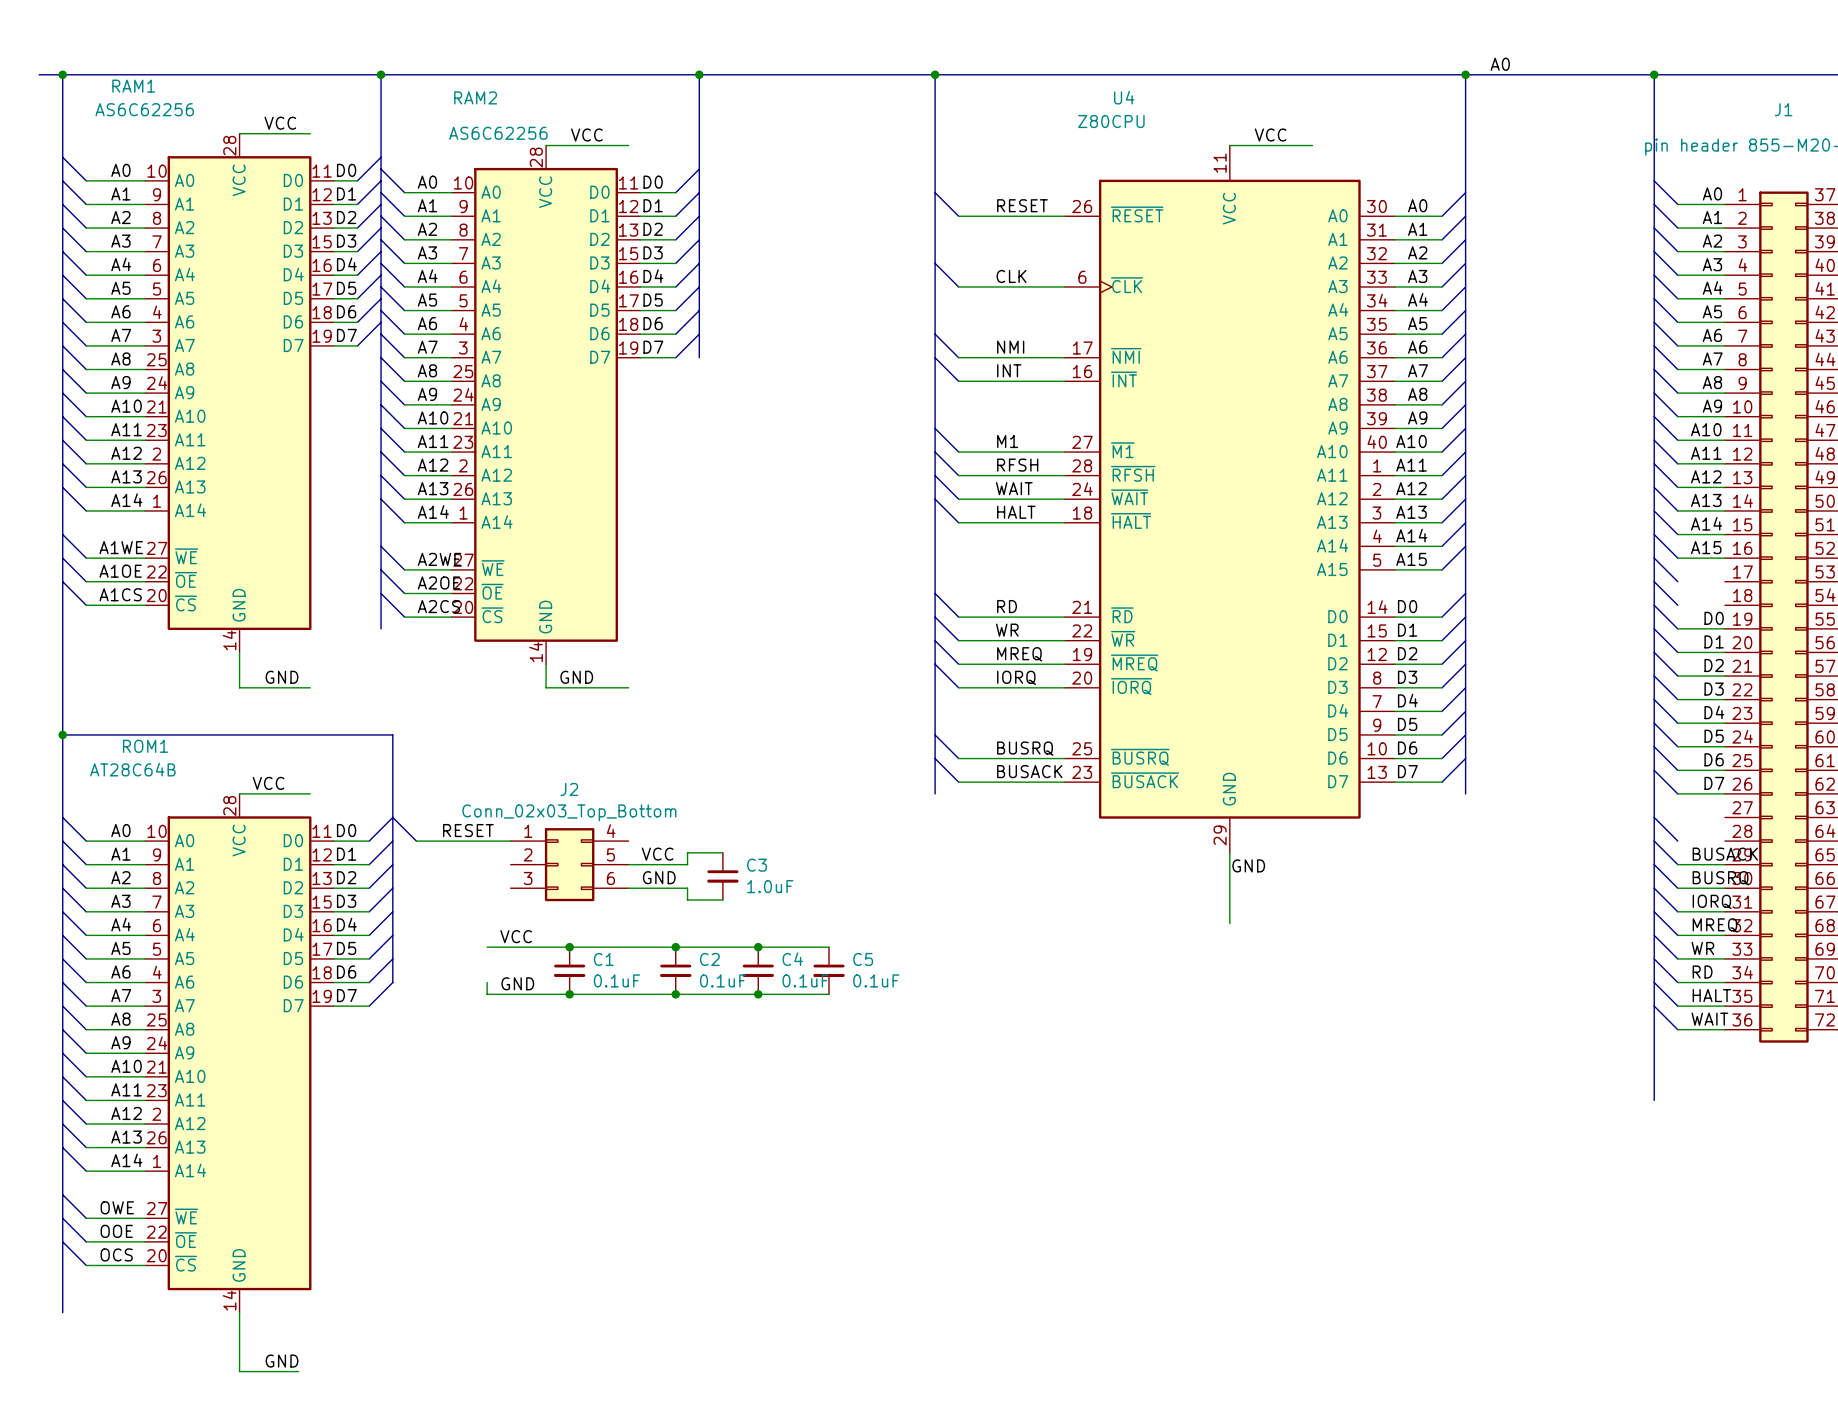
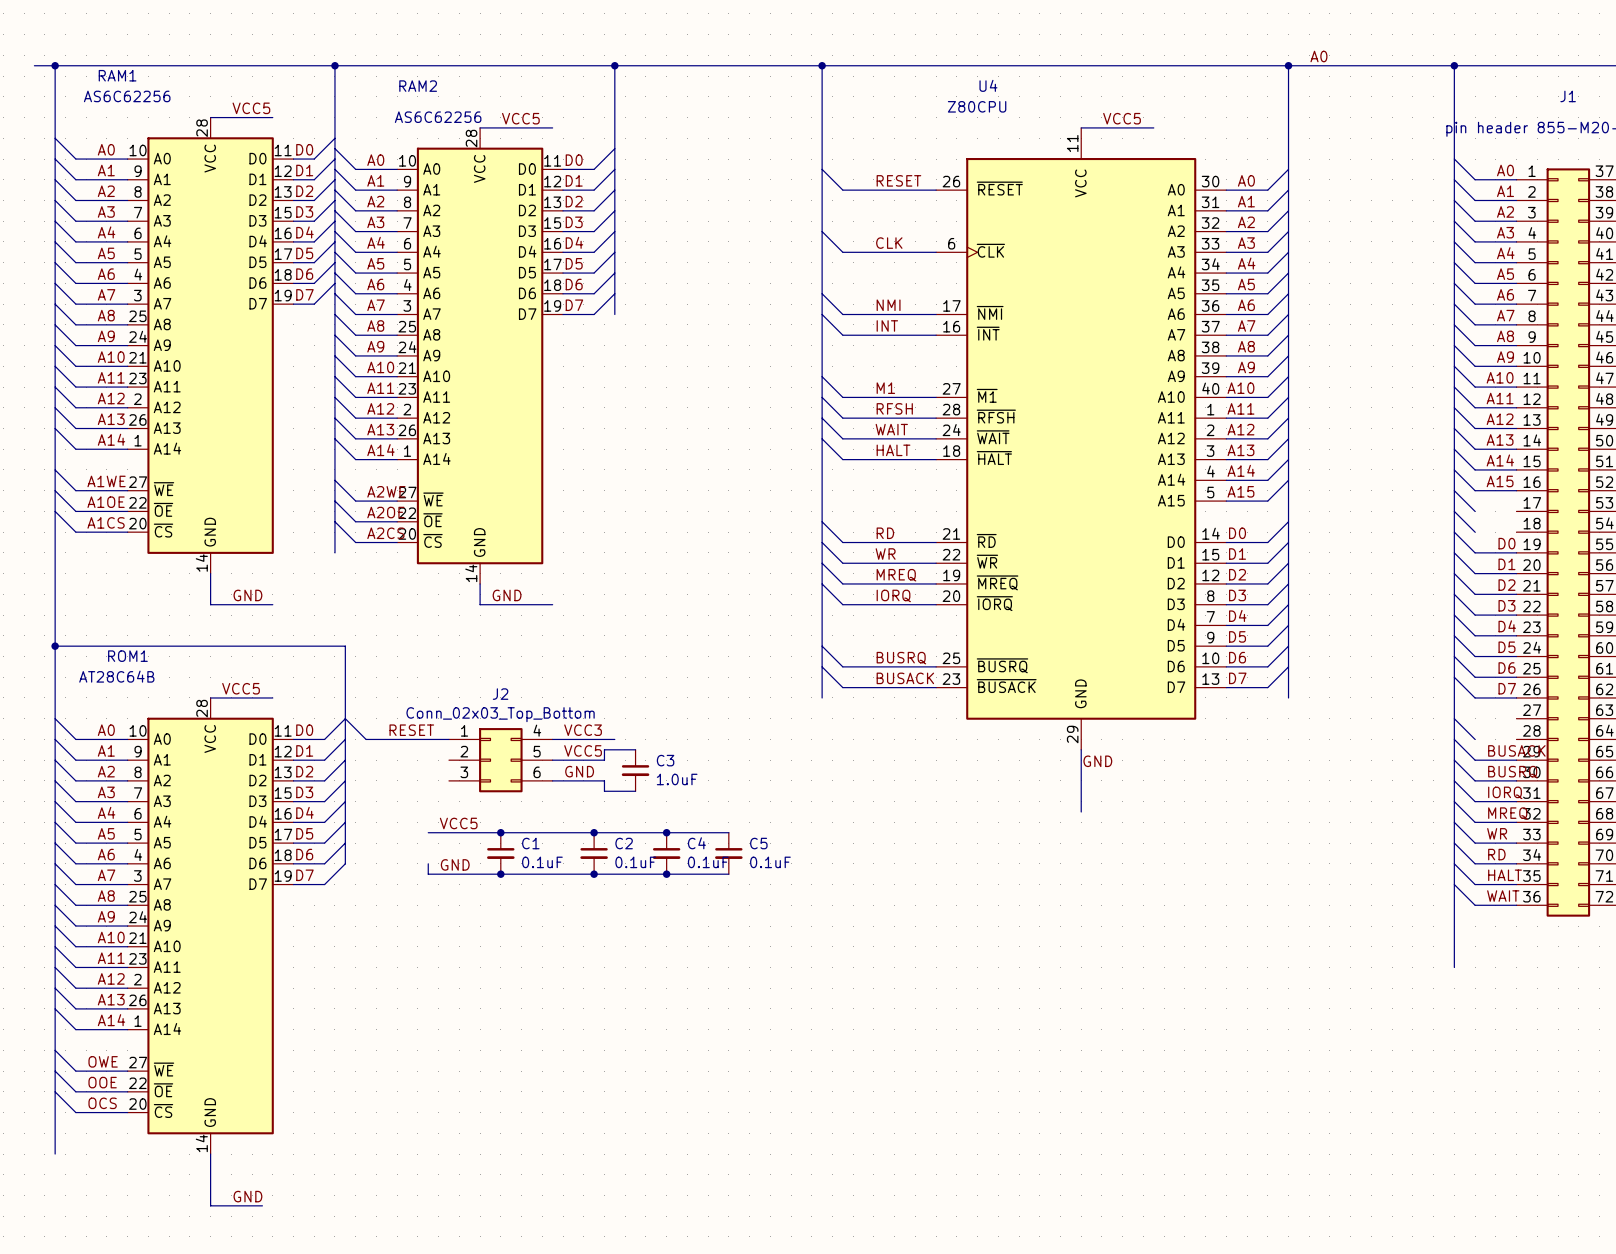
label: VCC (280, 123) -> VCC5 (251, 108)
label: VCC (586, 135) -> VCC5 (520, 118)
label: VCC (1270, 135) -> VCC5 (1122, 118)
label: VCC (268, 783) -> VCC5 (241, 688)
label: none -> VCC3 (583, 730)
wire: none -> (552, 739) (614, 739)
label: VCC (657, 854) -> VCC5 (583, 750)
label: VCC (516, 936) -> VCC5 (458, 823)

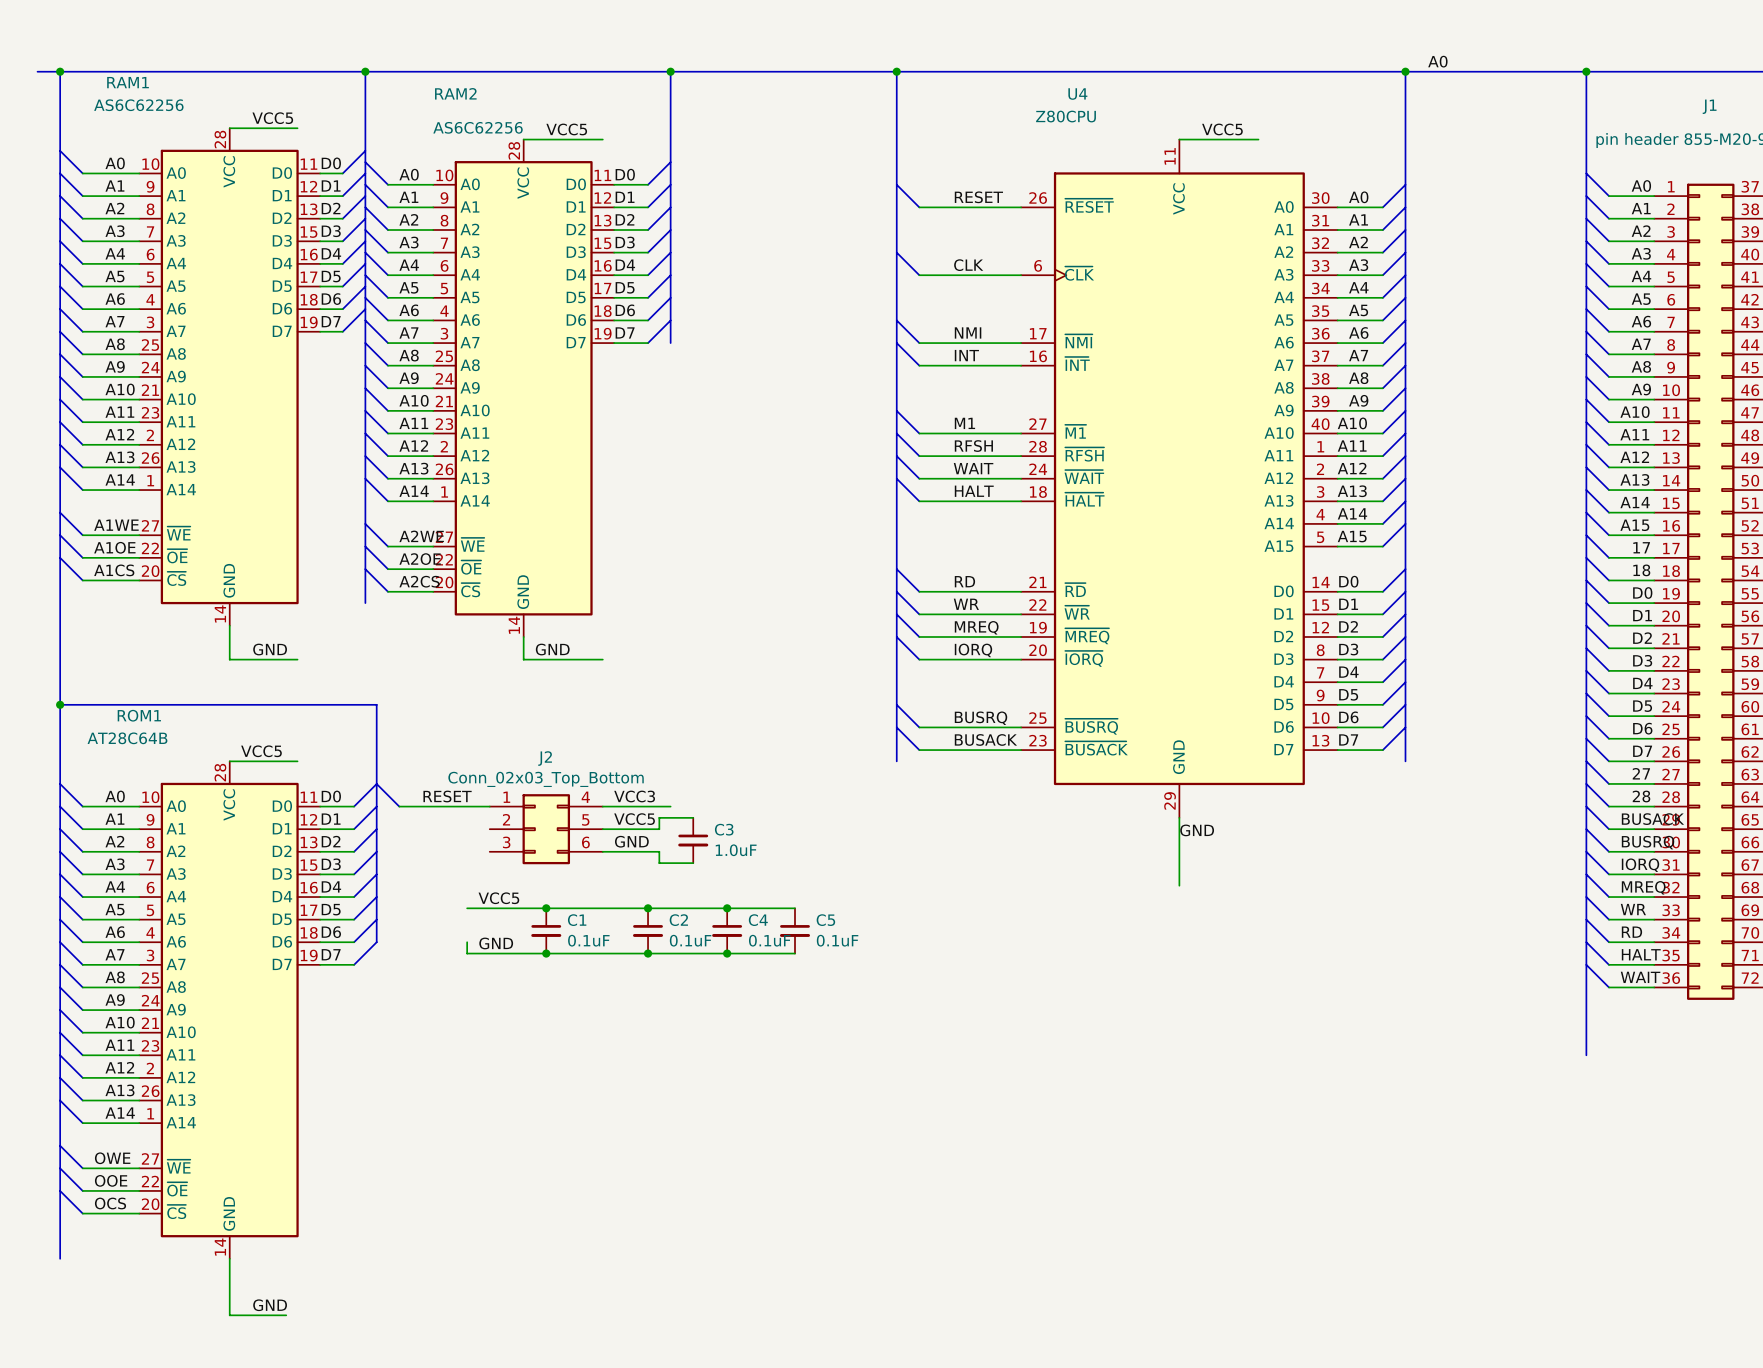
label: none -> 17 (1641, 547)
wire: none -> (1608, 557) (1654, 557)
label: none -> 18 (1641, 570)
wire: none -> (1608, 580) (1654, 580)
bus: none -> (1586, 761) (1608, 783)
label: none -> 27 (1641, 773)
wire: none -> (1608, 783) (1654, 783)
label: none -> 28 (1641, 796)
wire: none -> (1608, 806) (1654, 806)

